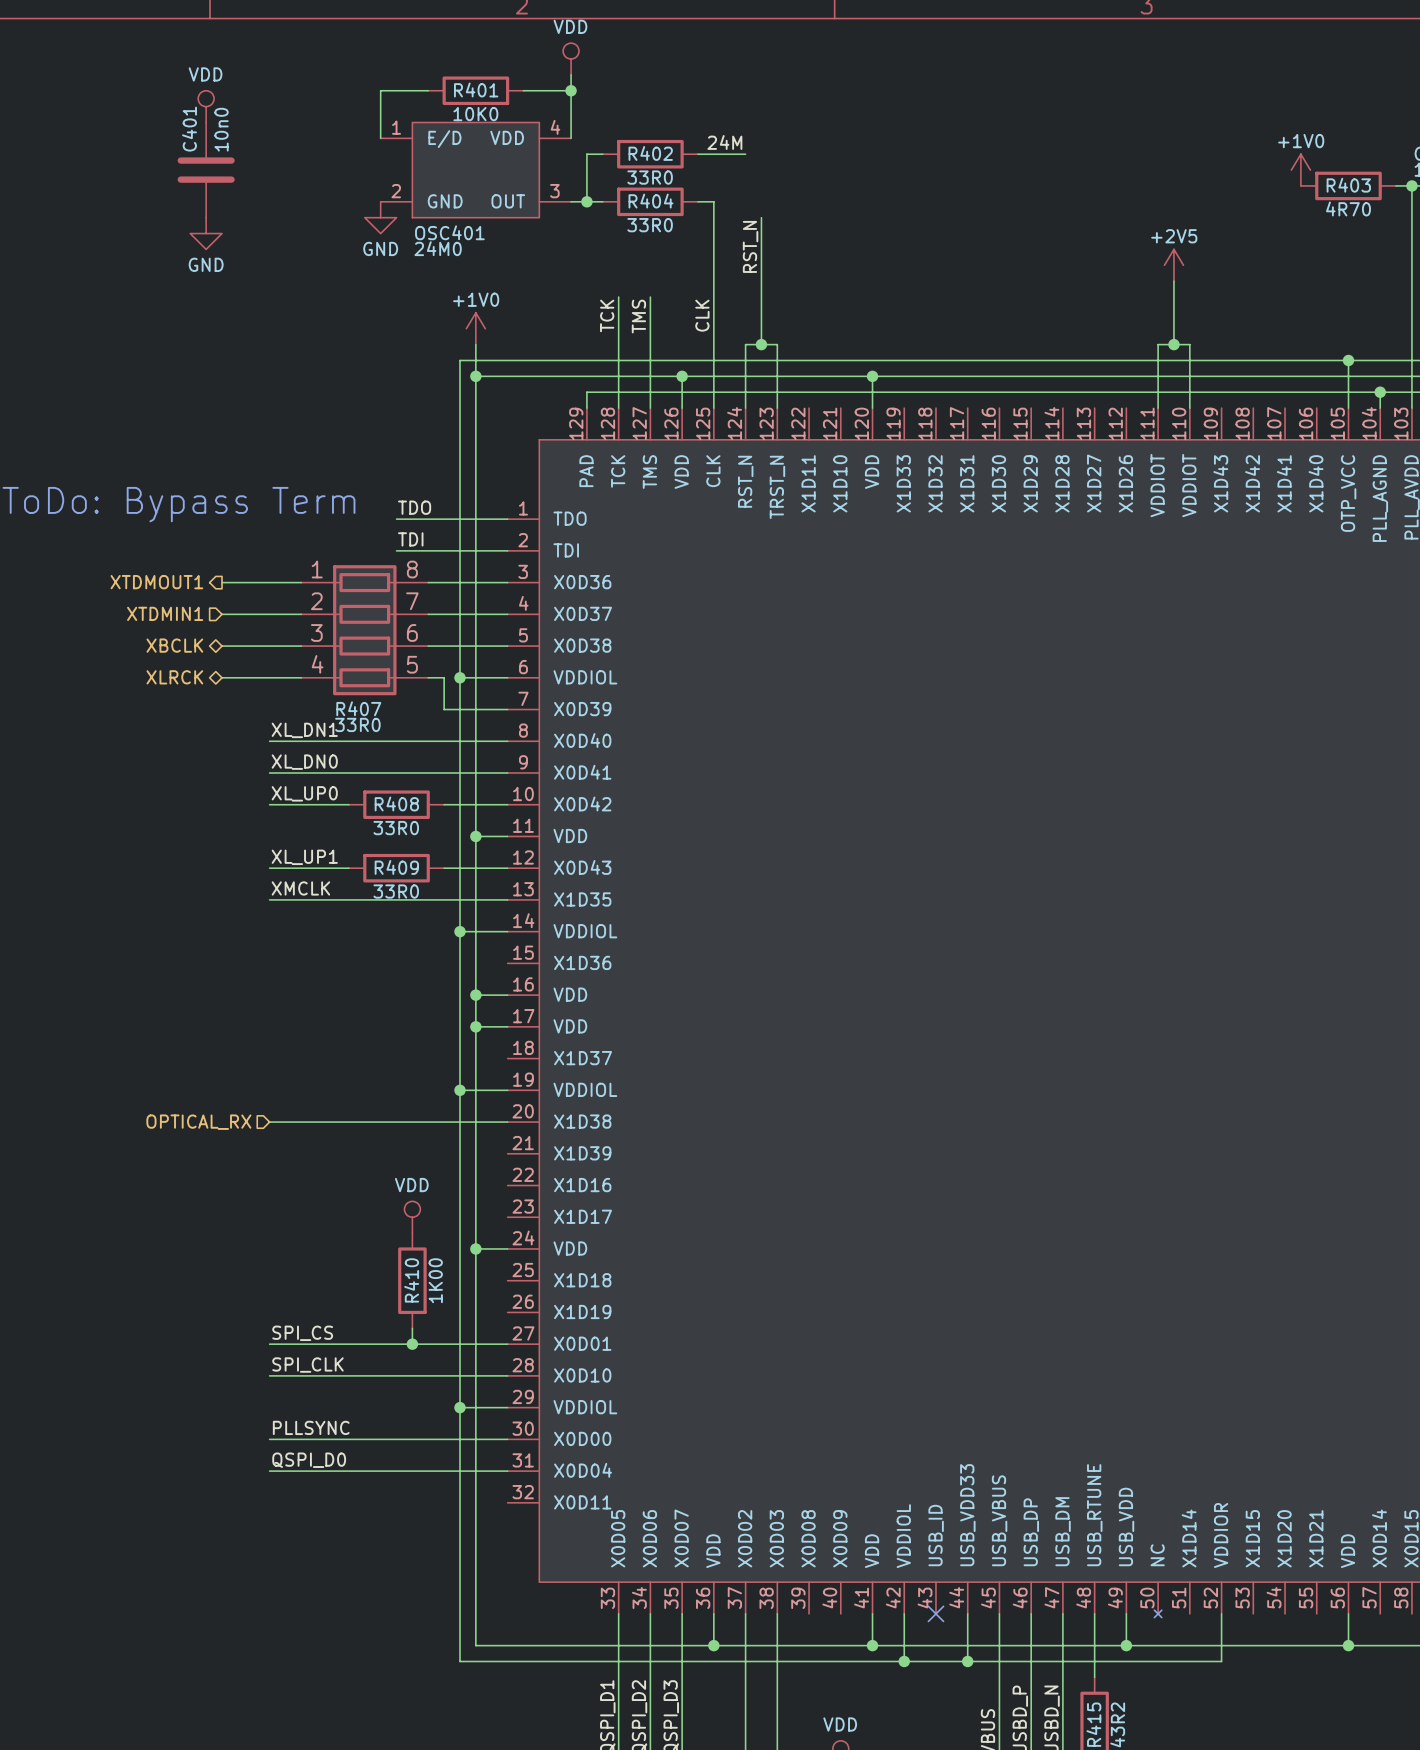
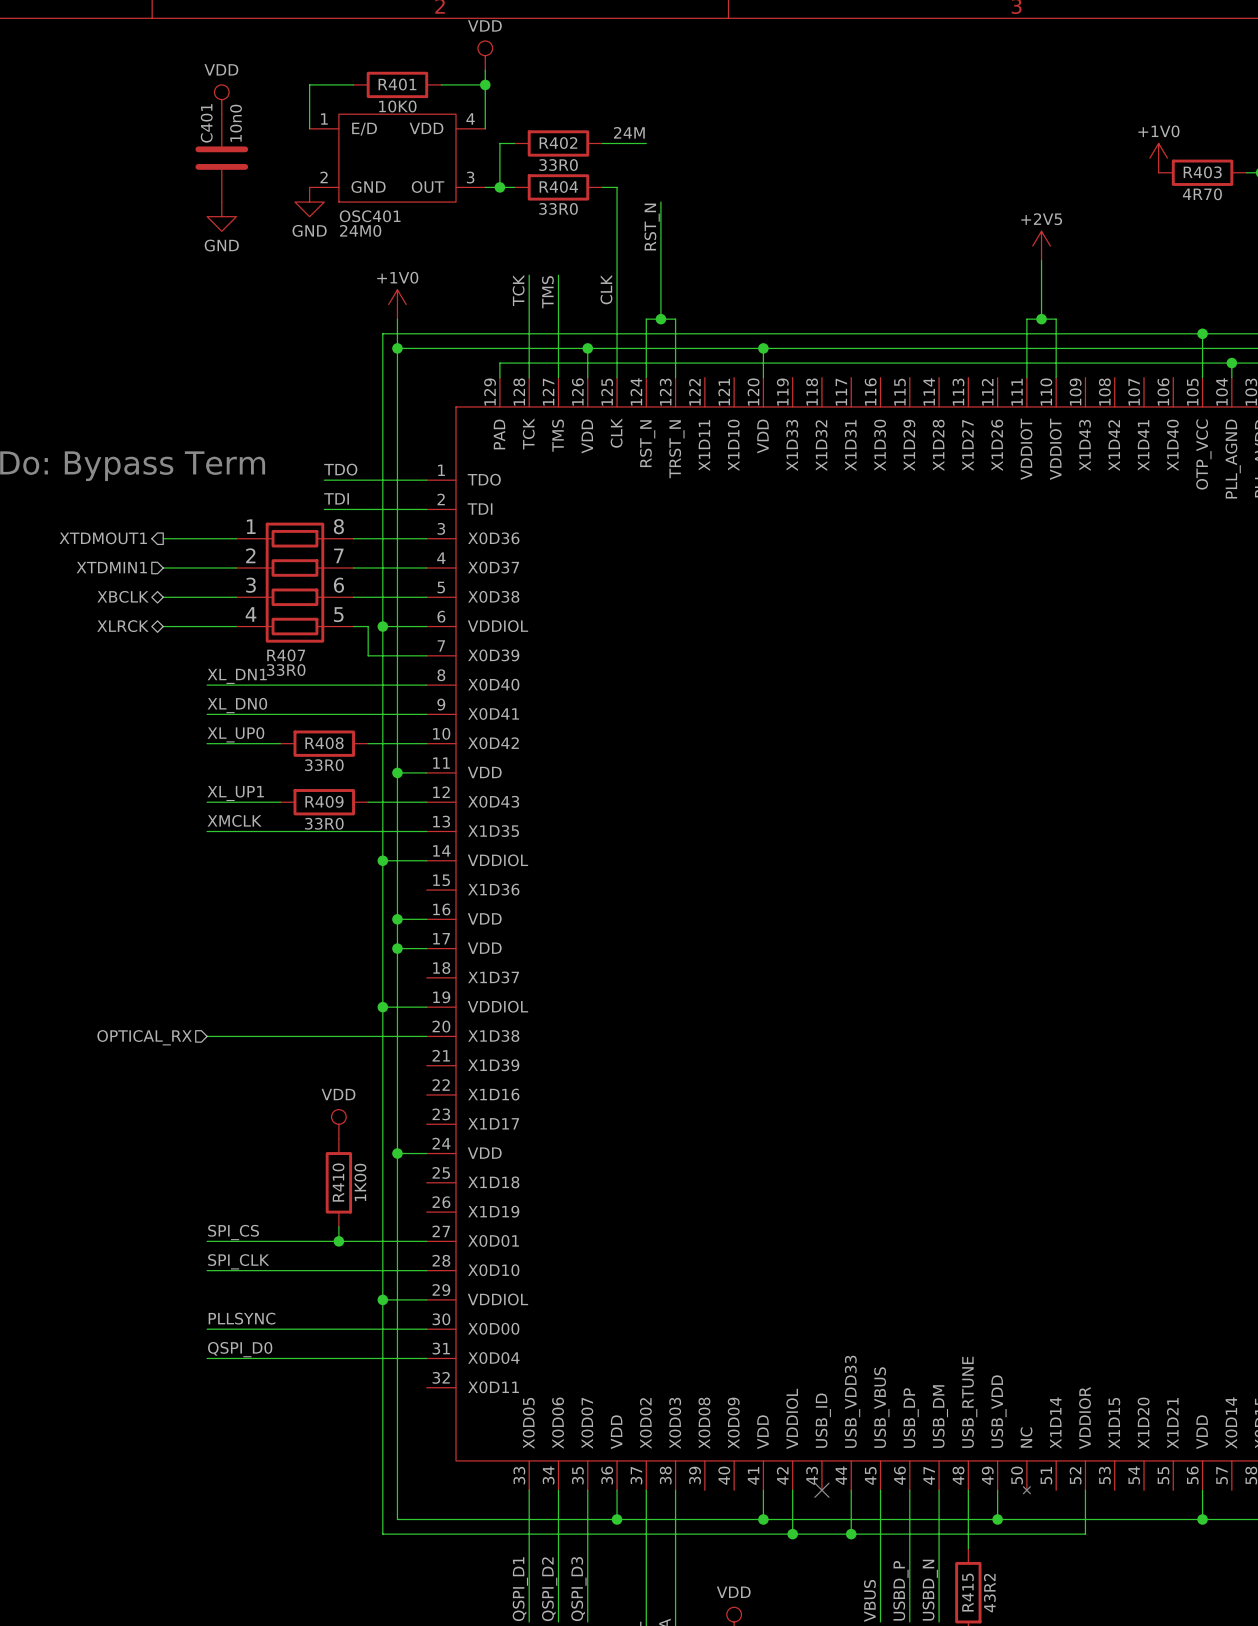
power symbol position: VDD (206, 106) -> VDD (221, 99)
C401 position: (206, 170) -> (221, 158)
power symbol position: GND (206, 233) -> GND (221, 216)

